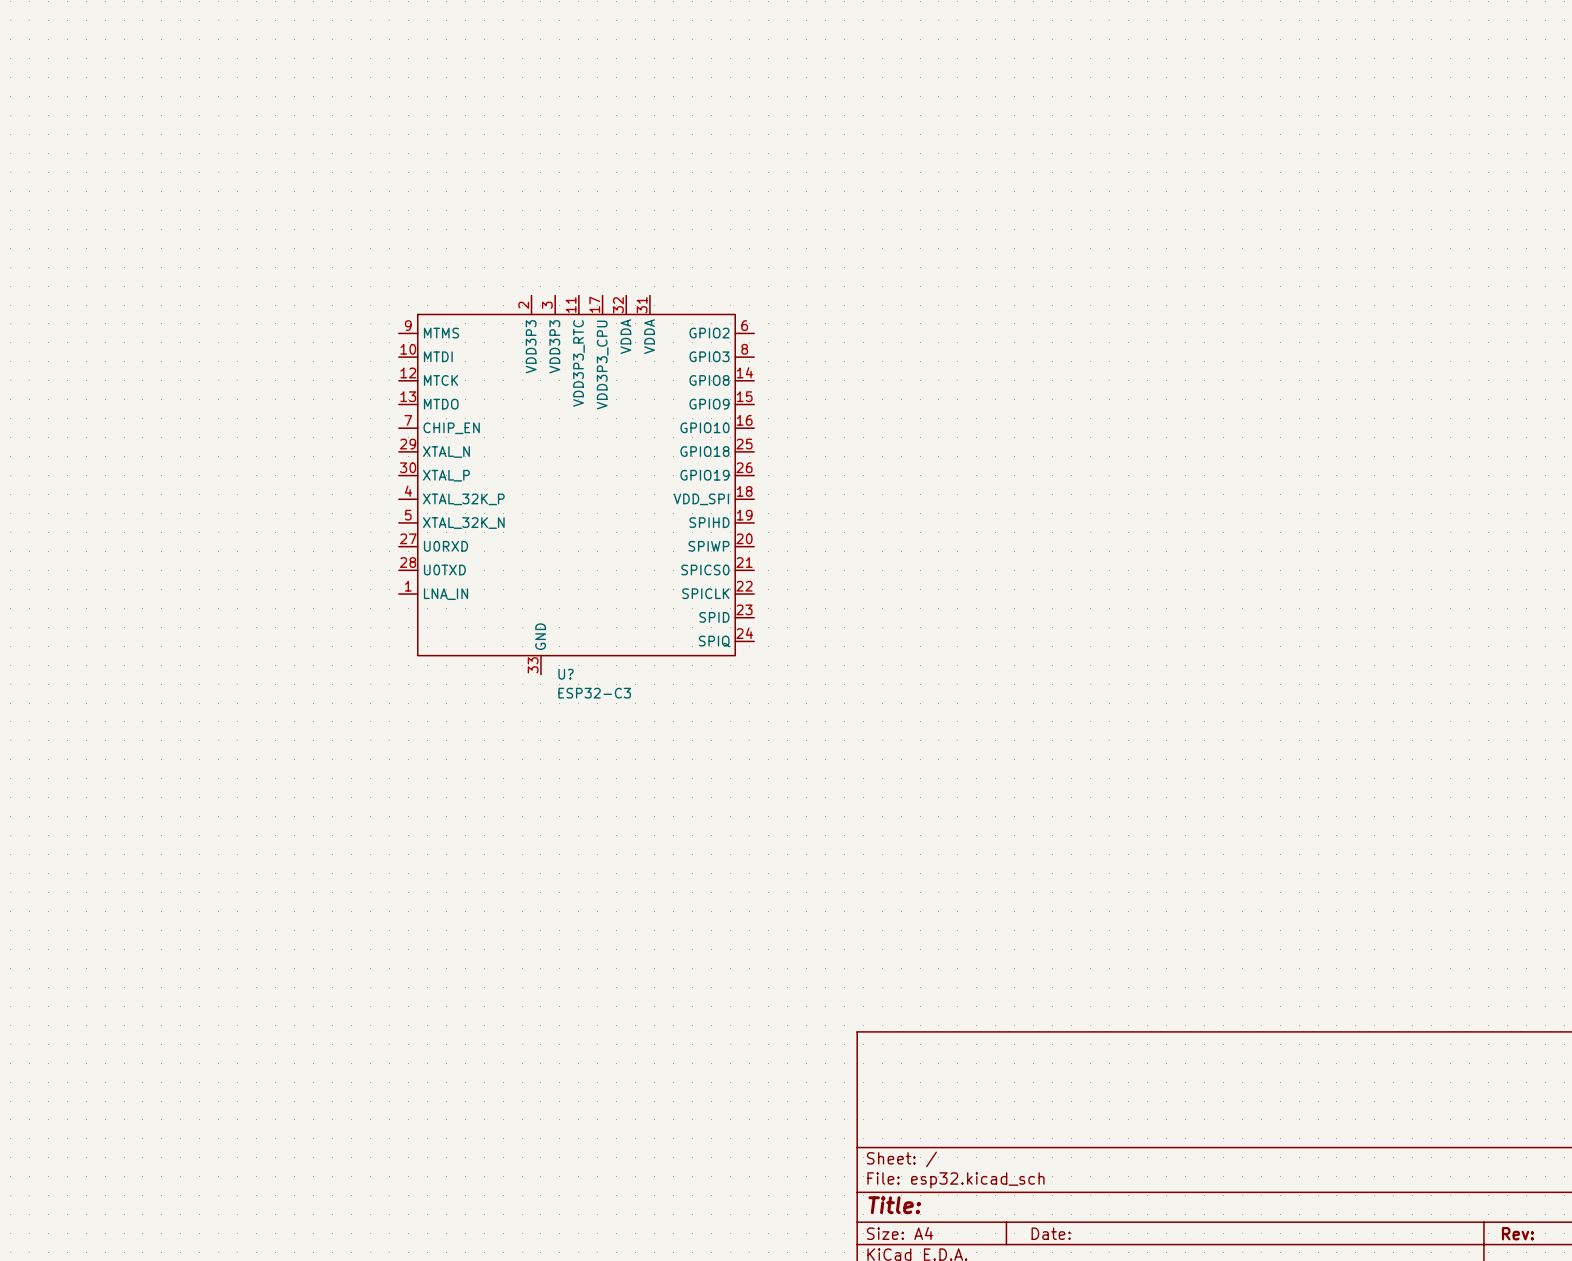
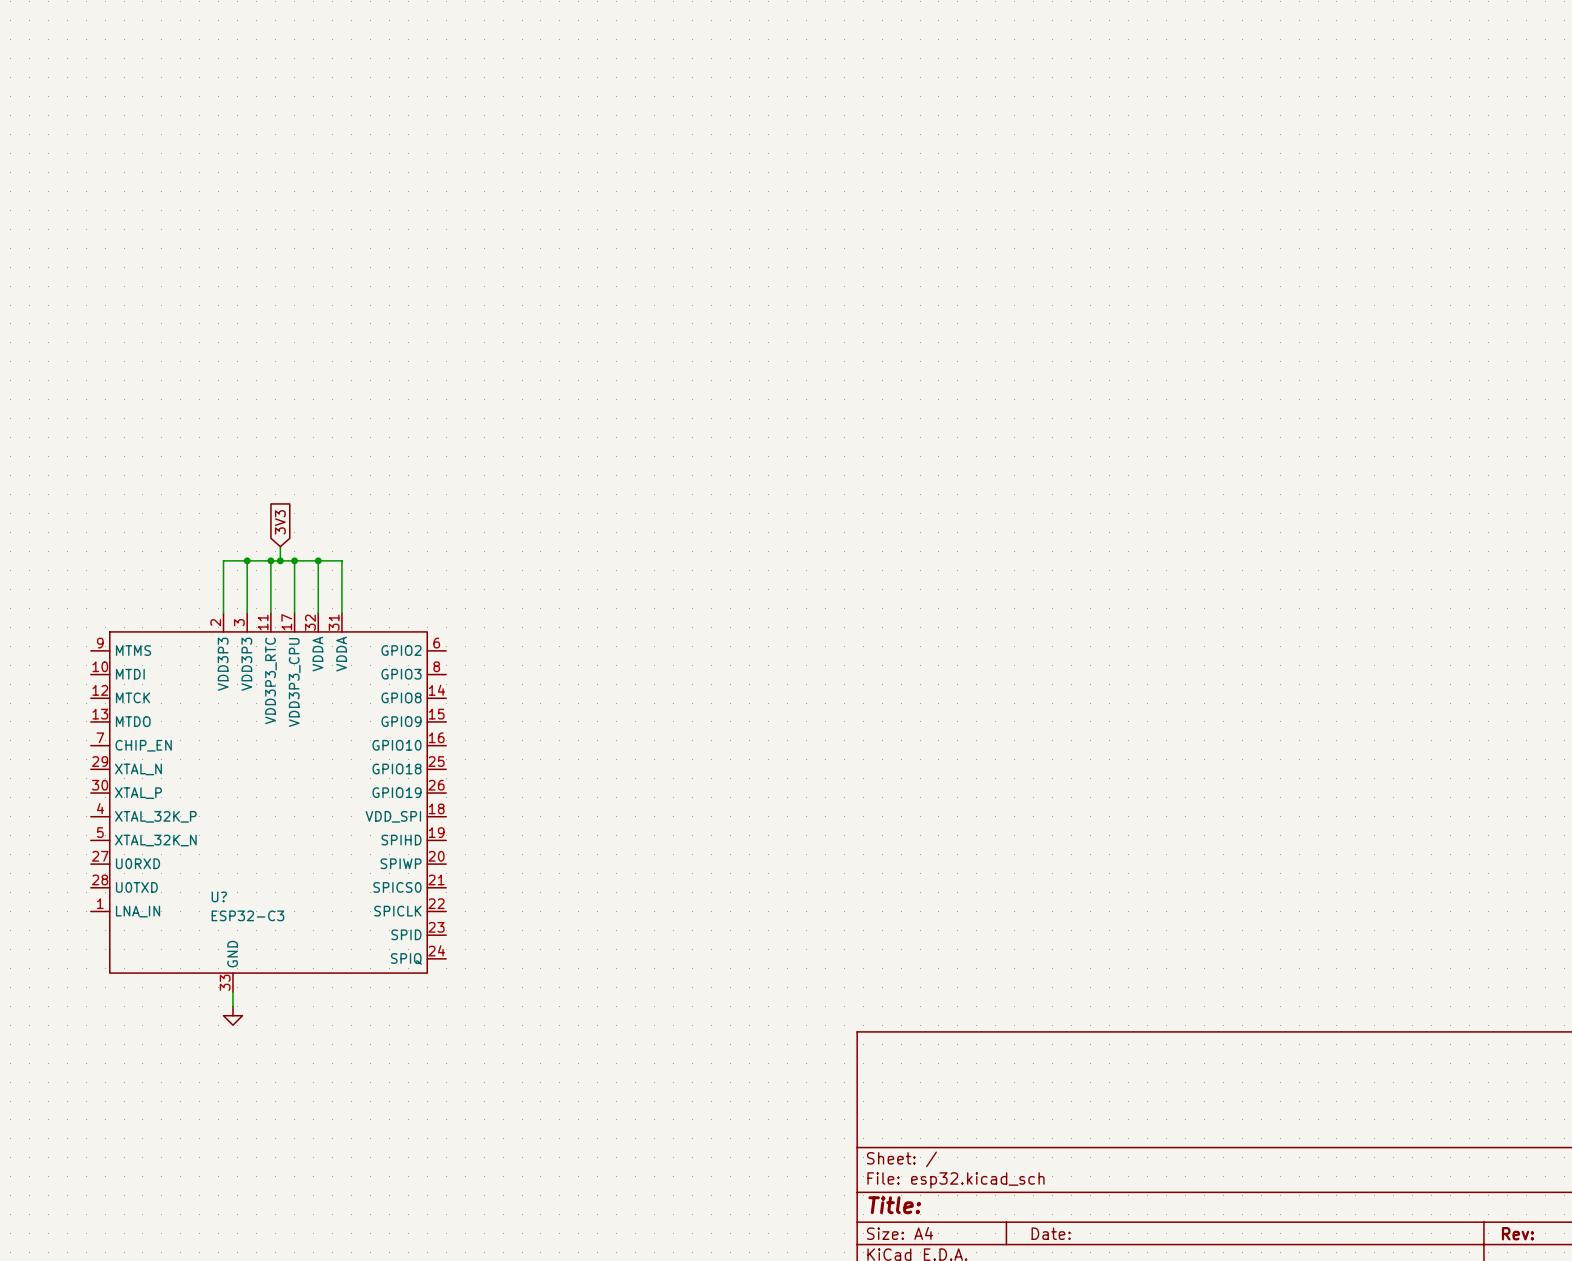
U?: ESP32-C3 (576, 485) -> none
global label: none -> 3V3 (280, 522)
wire: none -> (280, 546) (280, 560)
wire: none -> (247, 560) (247, 612)
junction: none -> (247, 560)
wire: none -> (270, 560) (270, 612)
junction: none -> (270, 560)
junction: none -> (280, 560)
wire: none -> (294, 560) (294, 612)
junction: none -> (294, 560)
wire: none -> (318, 560) (318, 612)
junction: none -> (318, 560)
wire: none -> (223, 612) (223, 560) (341, 560) (341, 612)
U?: none -> ESP32-C3 (268, 802)
wire: none -> (232, 992) (232, 1006)
power symbol: none -> (232, 1015)

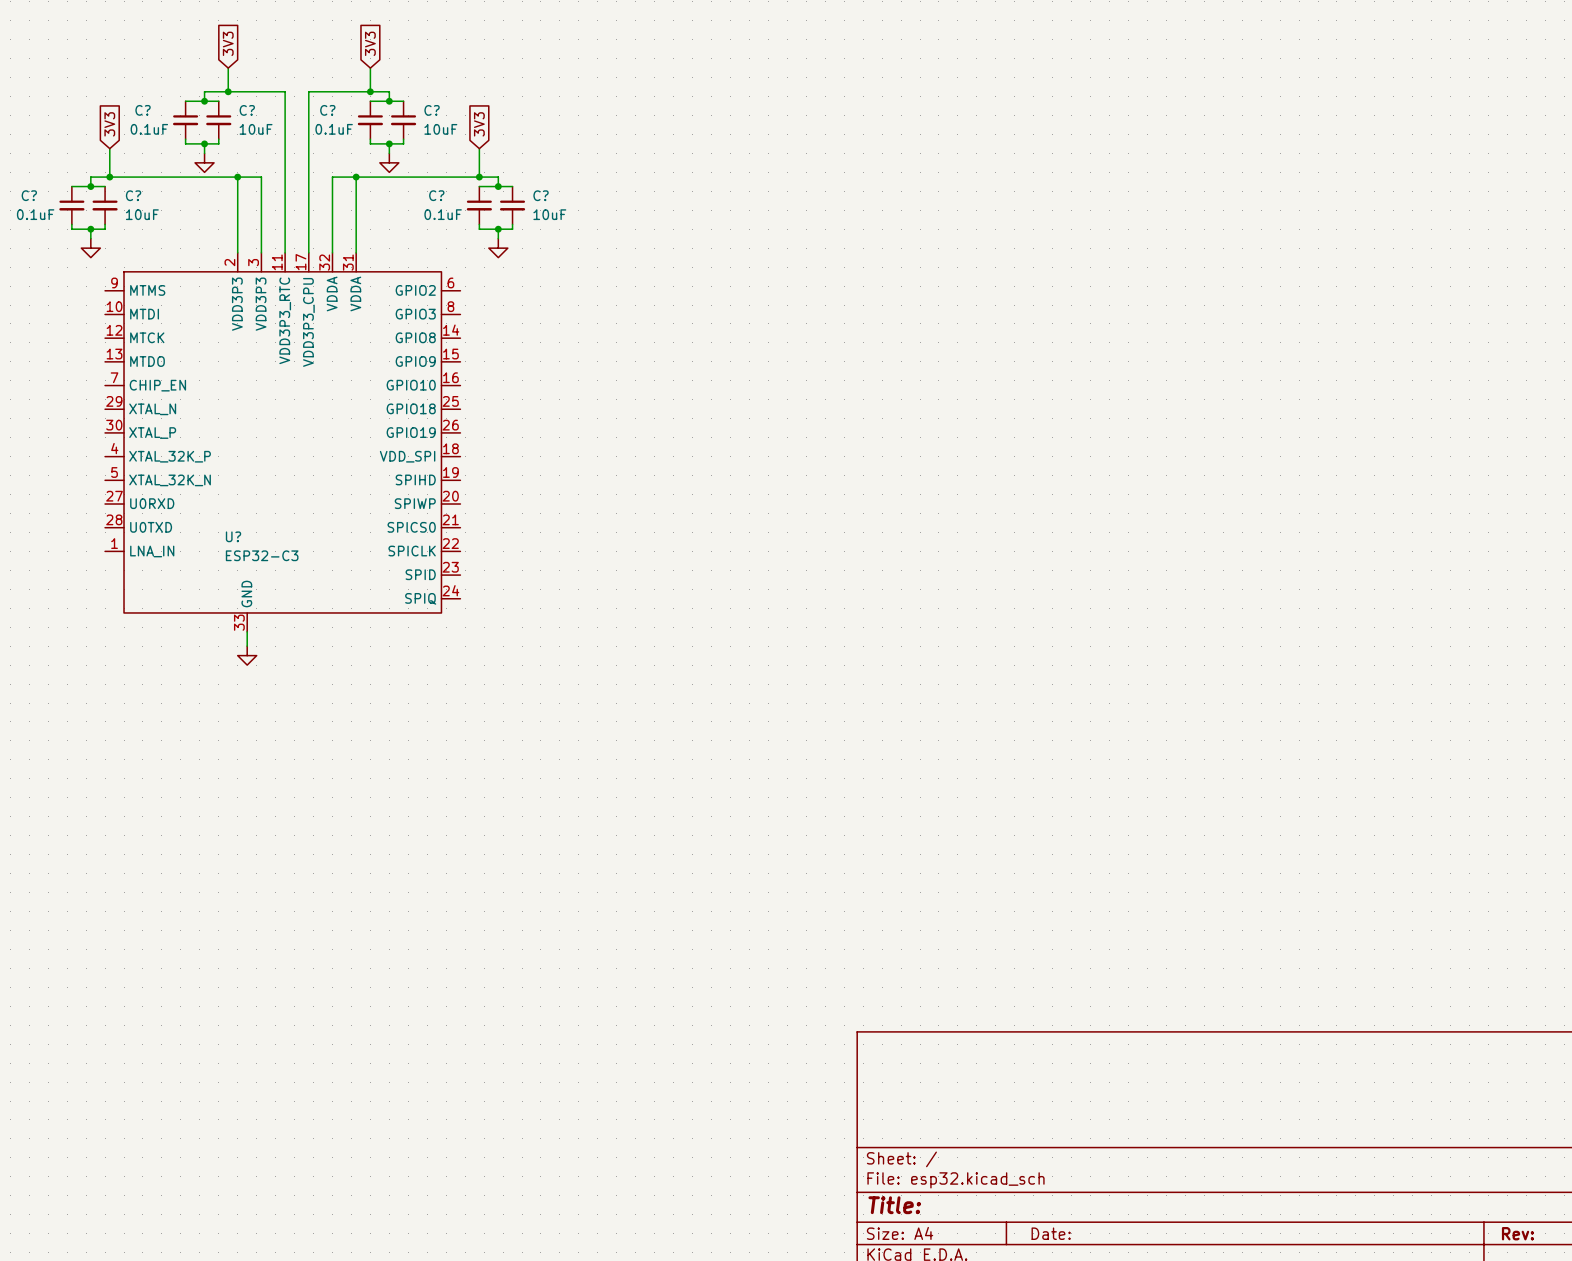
global label: none -> 3V3 (228, 43)
global label: none -> 3V3 (370, 43)
wire: none -> (228, 68) (228, 91)
wire: none -> (370, 68) (370, 91)
junction: none -> (228, 91)
junction: none -> (370, 91)
wire: none -> (185, 101) (218, 101)
wire: none -> (204, 101) (204, 91) (285, 91) (285, 252)
junction: none -> (204, 101)
wire: none -> (370, 101) (403, 101)
wire: none -> (389, 101) (389, 91) (308, 91) (308, 252)
junction: none -> (389, 101)
C?: none -> 0.1uF (185, 120)
C?: none -> 10uF (218, 120)
C?: none -> 0.1uF (370, 120)
C?: none -> 10uF (403, 120)
global label: none -> 3V3 (109, 124)
global label: none -> 3V3 (479, 124)
wire: none -> (185, 139) (185, 143) (218, 143) (218, 139)
wire: none -> (370, 139) (370, 143) (403, 143) (403, 139)
wire: none -> (204, 143) (204, 153)
junction: none -> (204, 143)
wire: none -> (389, 143) (389, 153)
junction: none -> (389, 143)
wire: none -> (109, 148) (109, 177)
wire: none -> (479, 148) (479, 177)
power symbol: none -> (204, 162)
power symbol: none -> (389, 162)
junction: none -> (109, 177)
wire: none -> (237, 177) (237, 252)
junction: none -> (237, 177)
wire: none -> (356, 177) (356, 252)
junction: none -> (356, 177)
junction: none -> (479, 177)
wire: none -> (71, 186) (105, 186)
wire: none -> (90, 186) (90, 177) (261, 177) (261, 252)
junction: none -> (90, 186)
wire: none -> (479, 186) (512, 186)
wire: none -> (498, 186) (498, 177) (332, 177) (332, 252)
junction: none -> (498, 186)
C?: none -> 0.1uF (71, 205)
C?: none -> 10uF (105, 205)
C?: none -> 0.1uF (479, 205)
C?: none -> 10uF (512, 205)
wire: none -> (71, 224) (71, 229) (105, 229) (105, 224)
wire: none -> (479, 224) (479, 229) (512, 229) (512, 224)
wire: none -> (90, 229) (90, 238)
junction: none -> (90, 229)
wire: none -> (498, 229) (498, 238)
junction: none -> (498, 229)
power symbol: none -> (90, 248)
power symbol: none -> (498, 248)
U?: none -> ESP32-C3 (282, 442)
global label: 3V3 (280, 522) -> none
wire: (280, 546) (280, 560) -> (247, 631) (247, 646)
wire: (247, 560) (247, 612) -> none
junction: (247, 560) -> none
wire: (270, 560) (270, 612) -> none
junction: (270, 560) -> none
junction: (280, 560) -> none
wire: (294, 560) (294, 612) -> none
junction: (294, 560) -> none
wire: (318, 560) (318, 612) -> none
junction: (318, 560) -> none
wire: (223, 612) (223, 560) (341, 560) (341, 612) -> none
power symbol: none -> (247, 655)
U?: ESP32-C3 (268, 802) -> none
wire: (232, 992) (232, 1006) -> none
power symbol: (232, 1015) -> none

